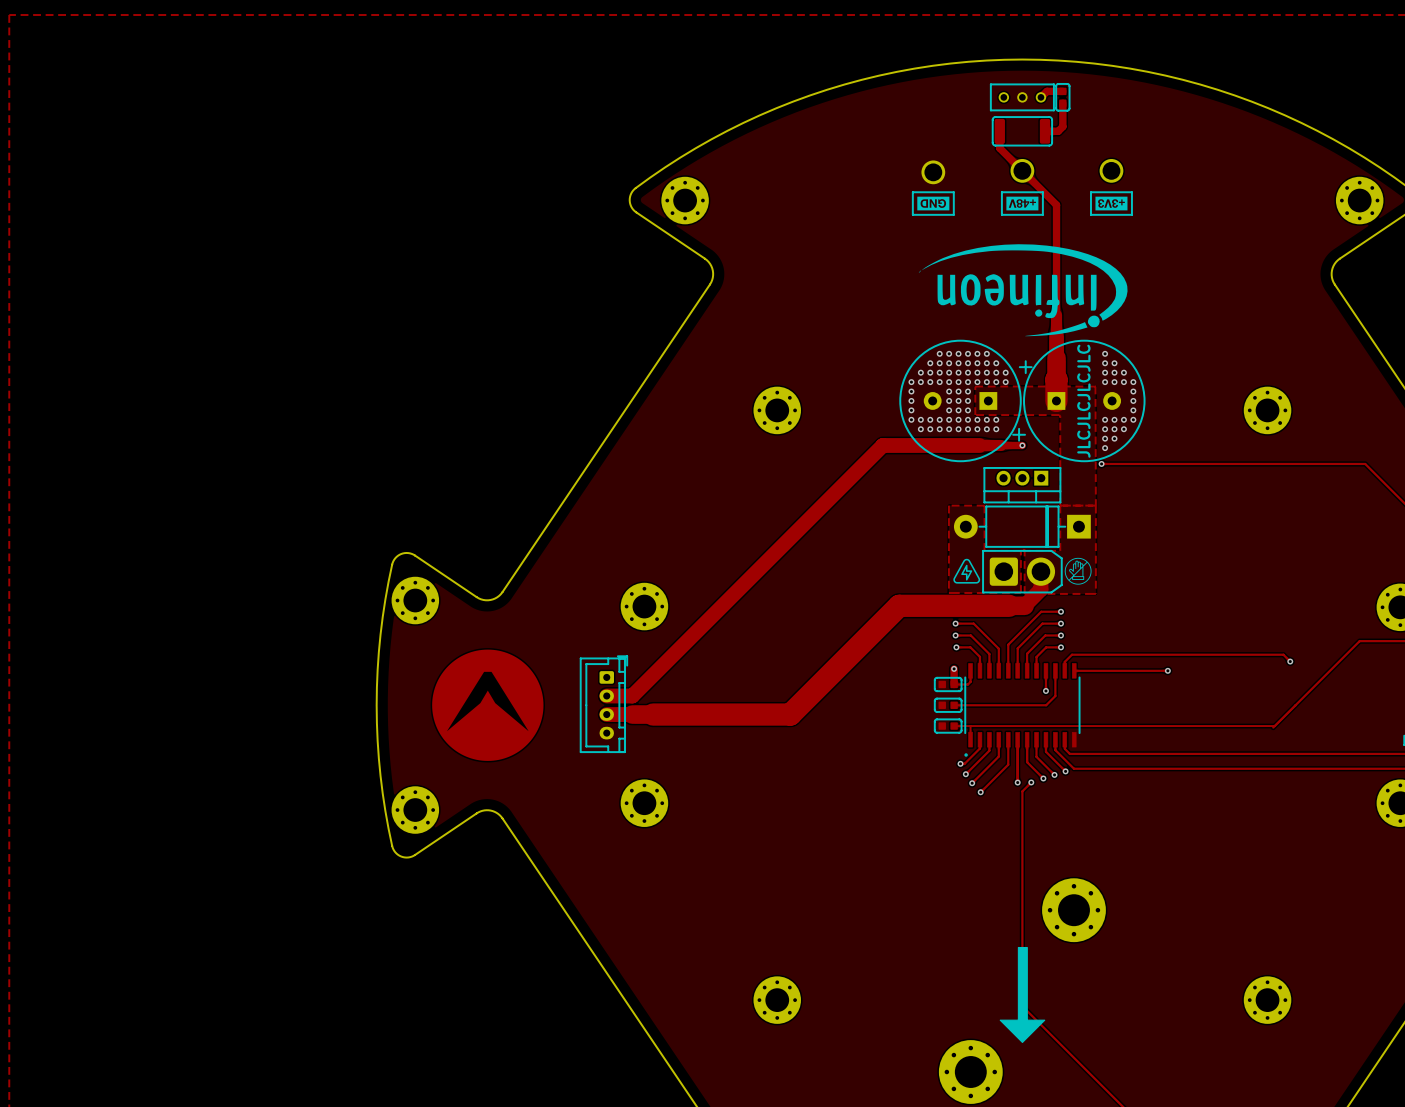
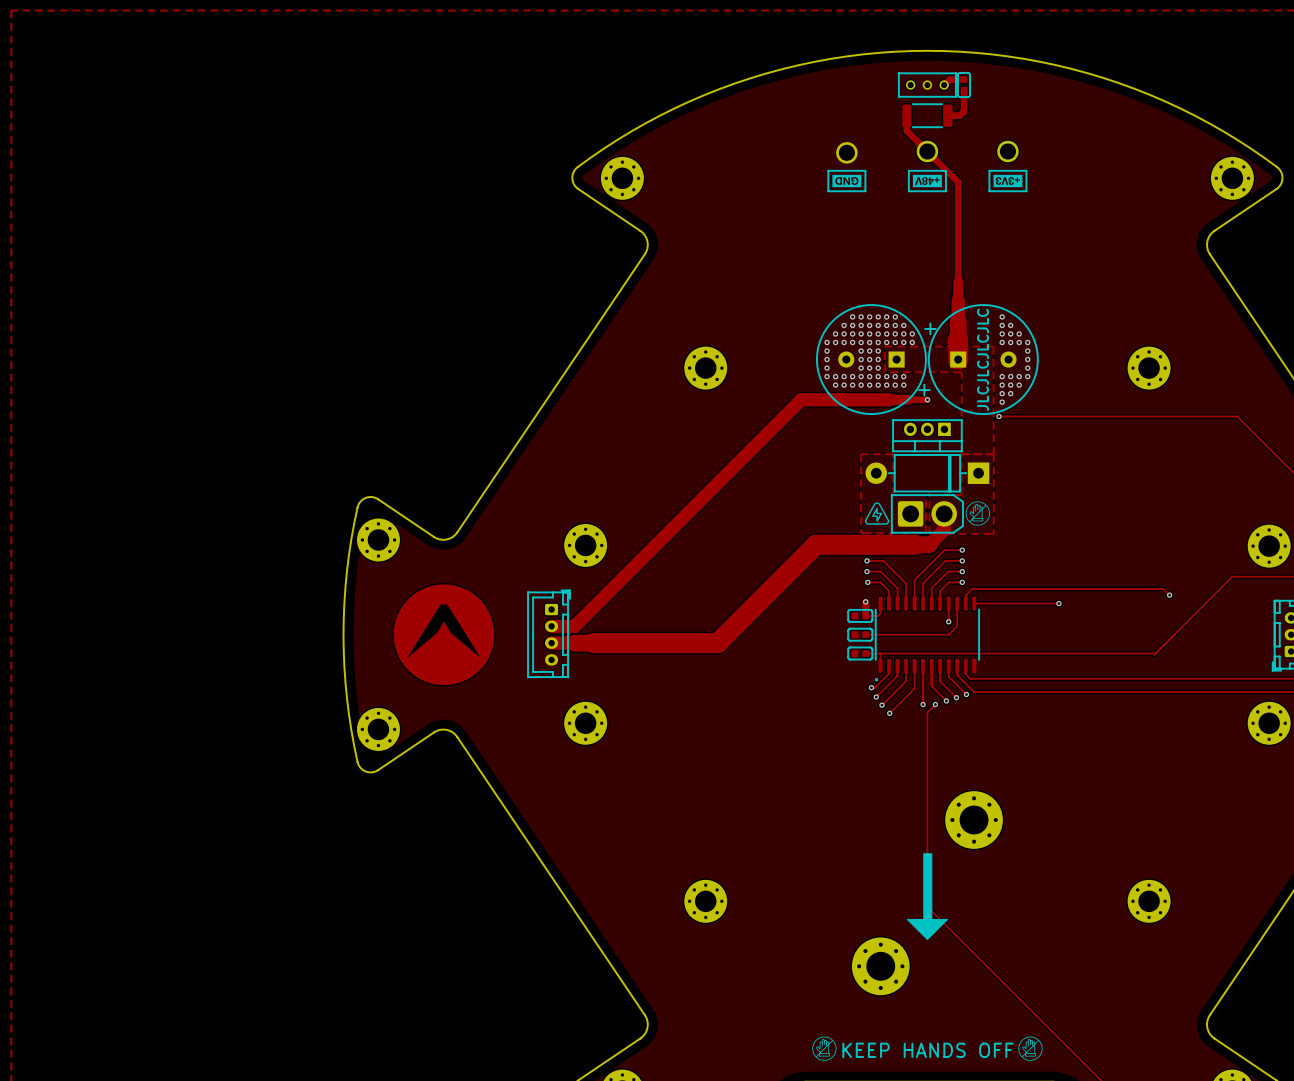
part footprint: [992, 116, 1053, 146] -> [902, 103, 953, 128]
drawing: [918, 244, 1128, 337] -> none

